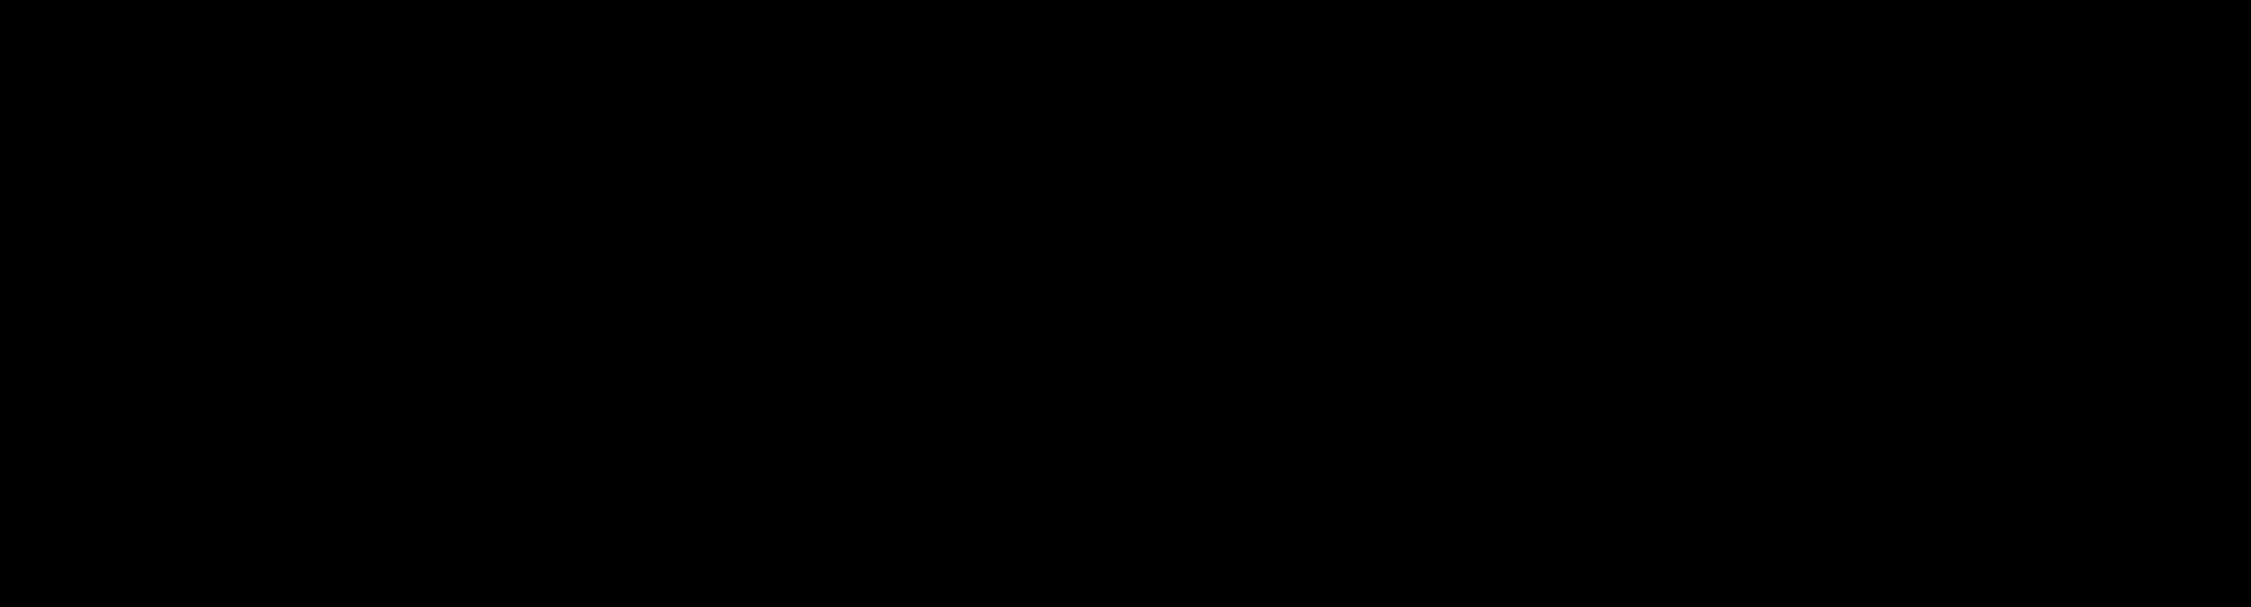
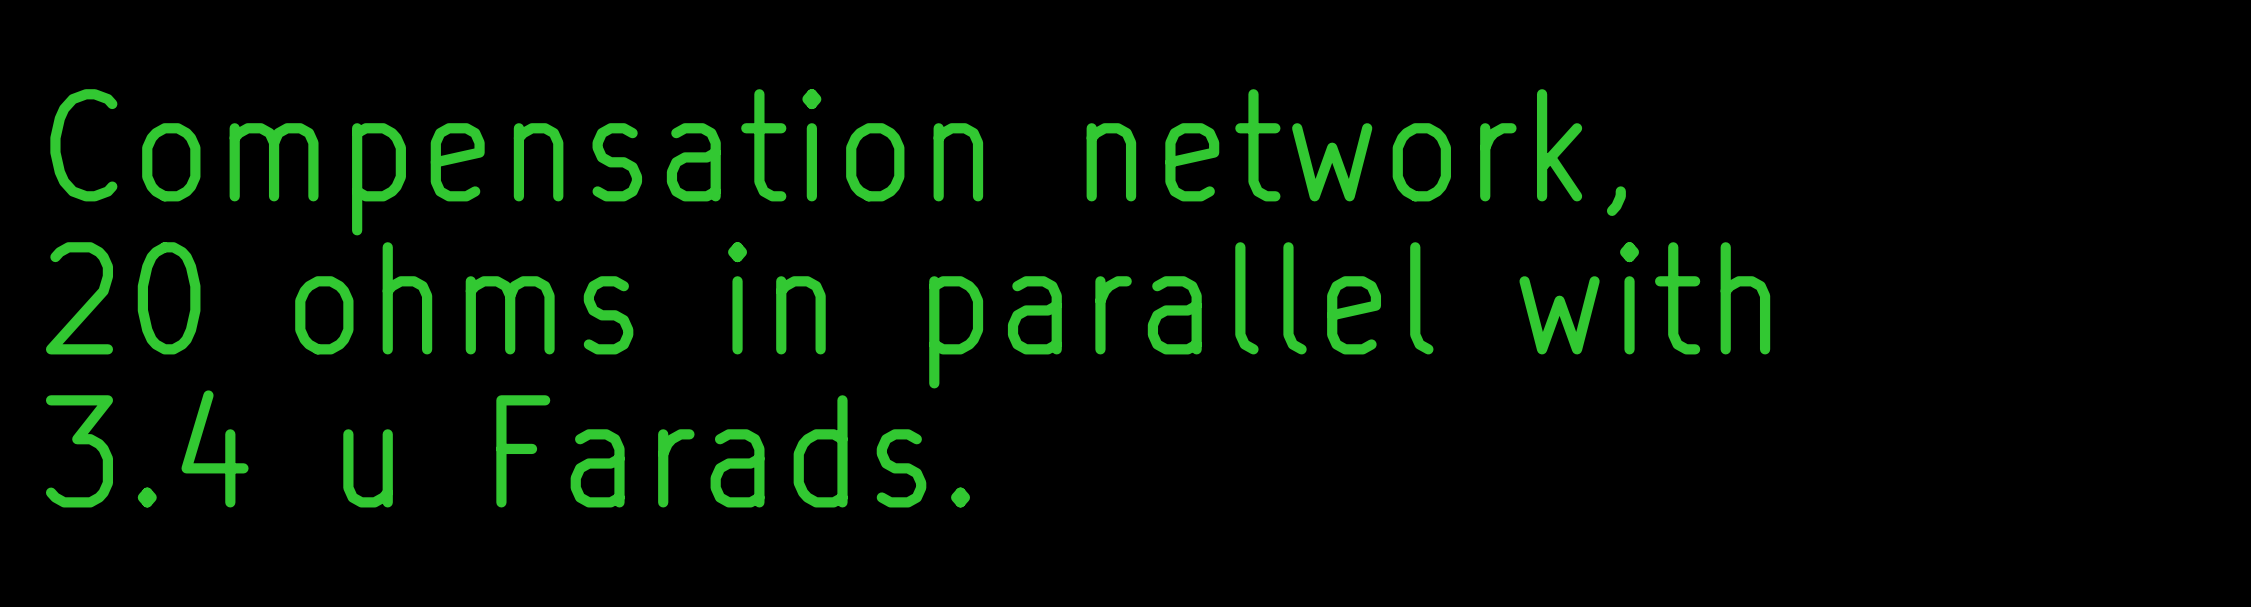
text: none -> Compensation network, (838, 162)
text: none -> 20 ohms in parallel with (908, 315)
text: none -> 3.4 u Farads. (507, 448)

